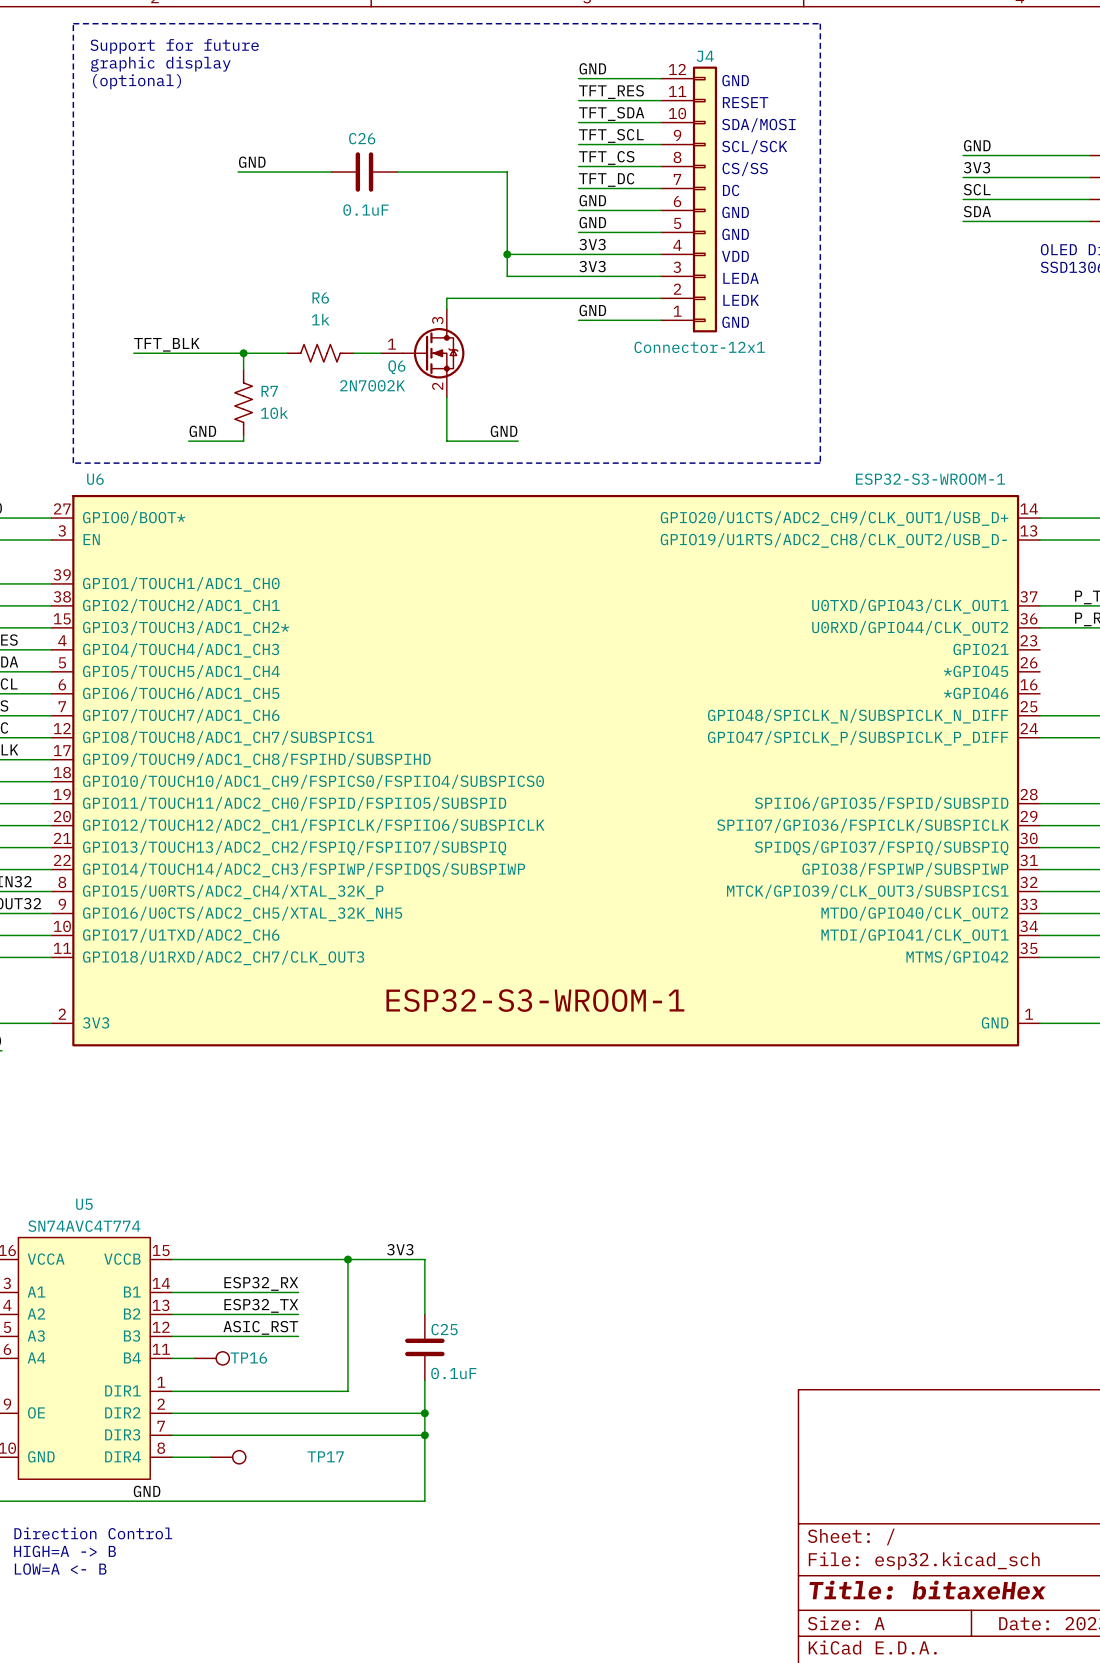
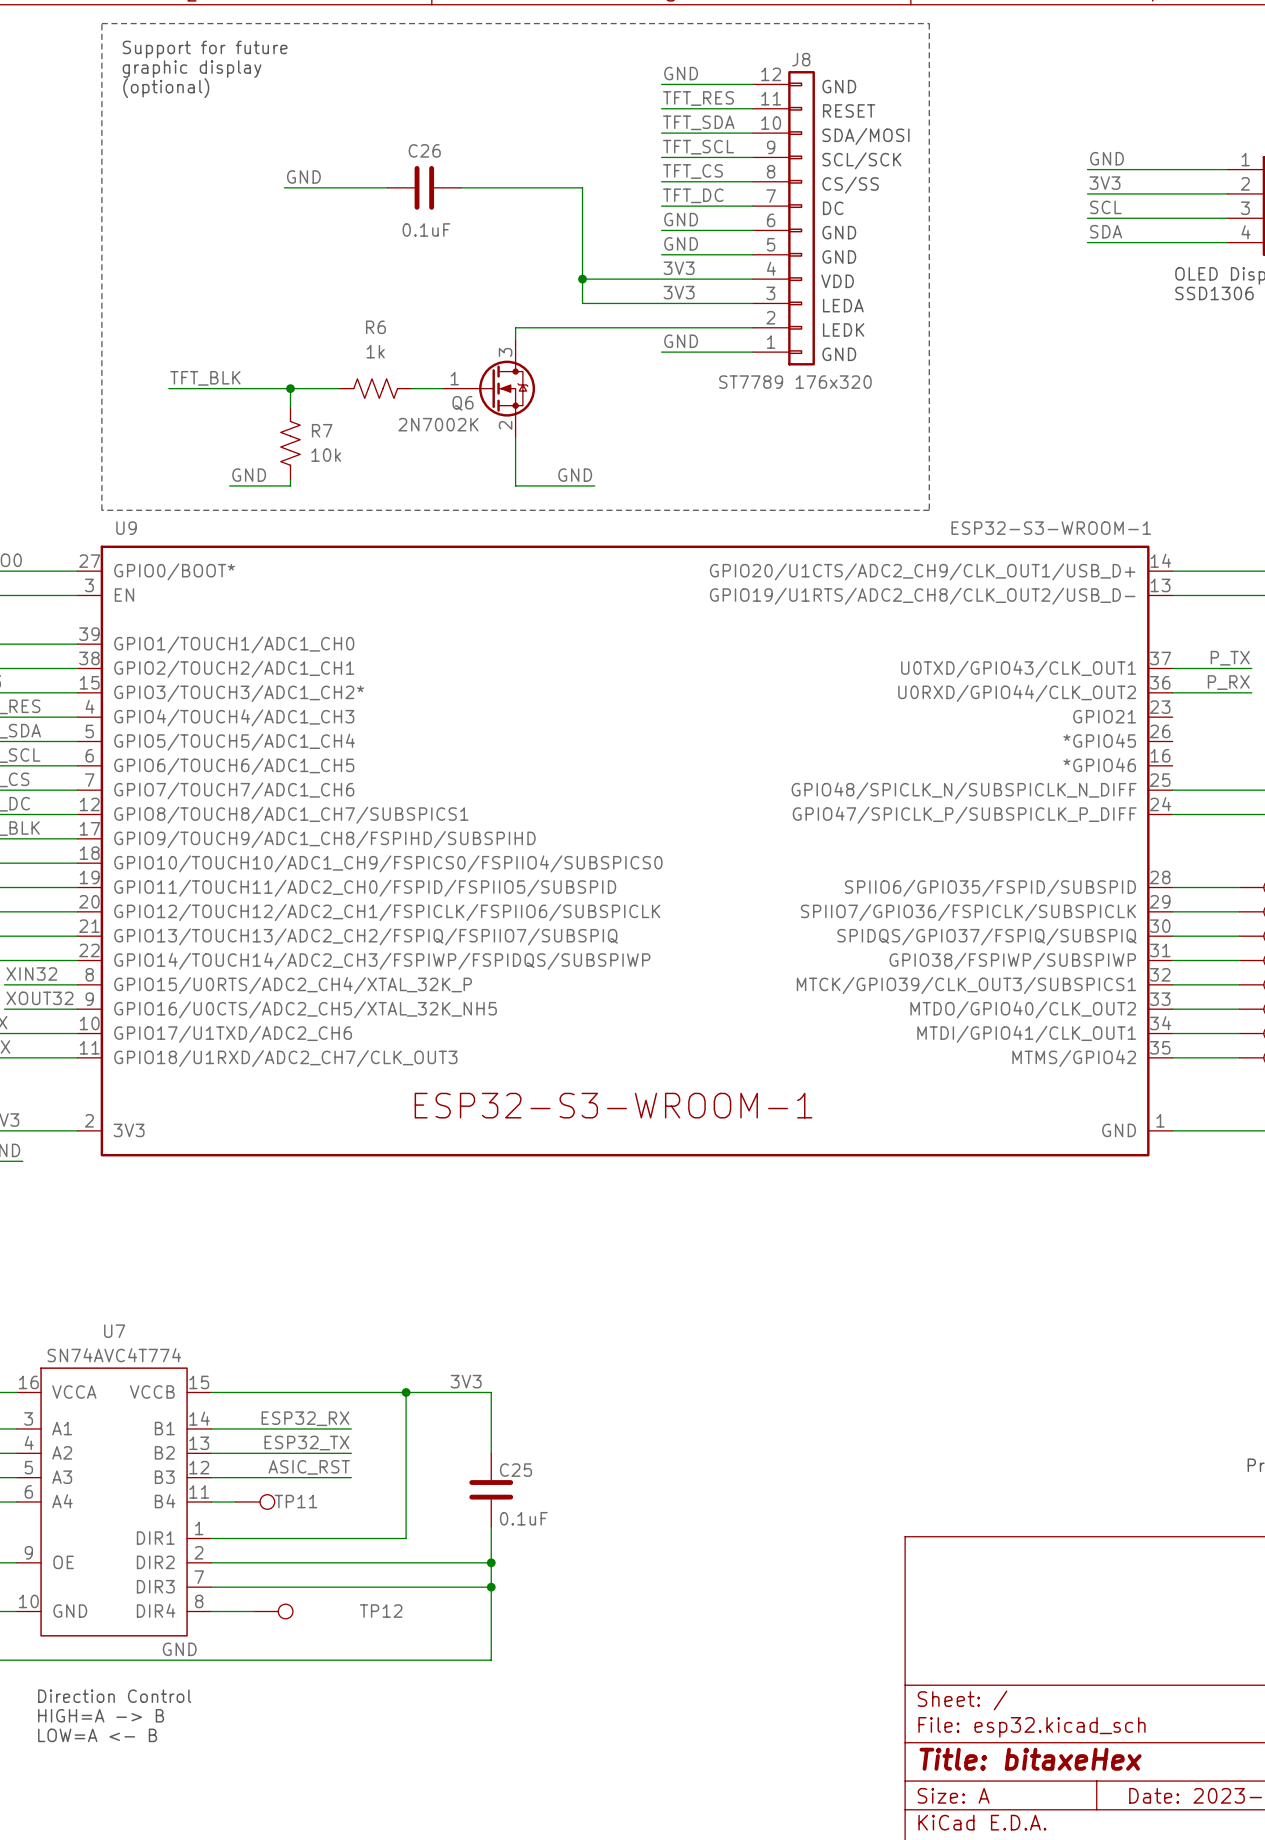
J4 name: J4 (705, 56) -> J8 (801, 59)
J4 value: Connector-12x1 (699, 347) -> ST7789 176x320 (795, 382)
U6 name: U6 (95, 479) -> U9 (126, 528)
U5 name: U5 (84, 1204) -> U7 (114, 1331)
TP16 name: TP16 (248, 1358) -> TP11 (295, 1501)
TP17 name: TP17 (325, 1456) -> TP12 (381, 1611)

